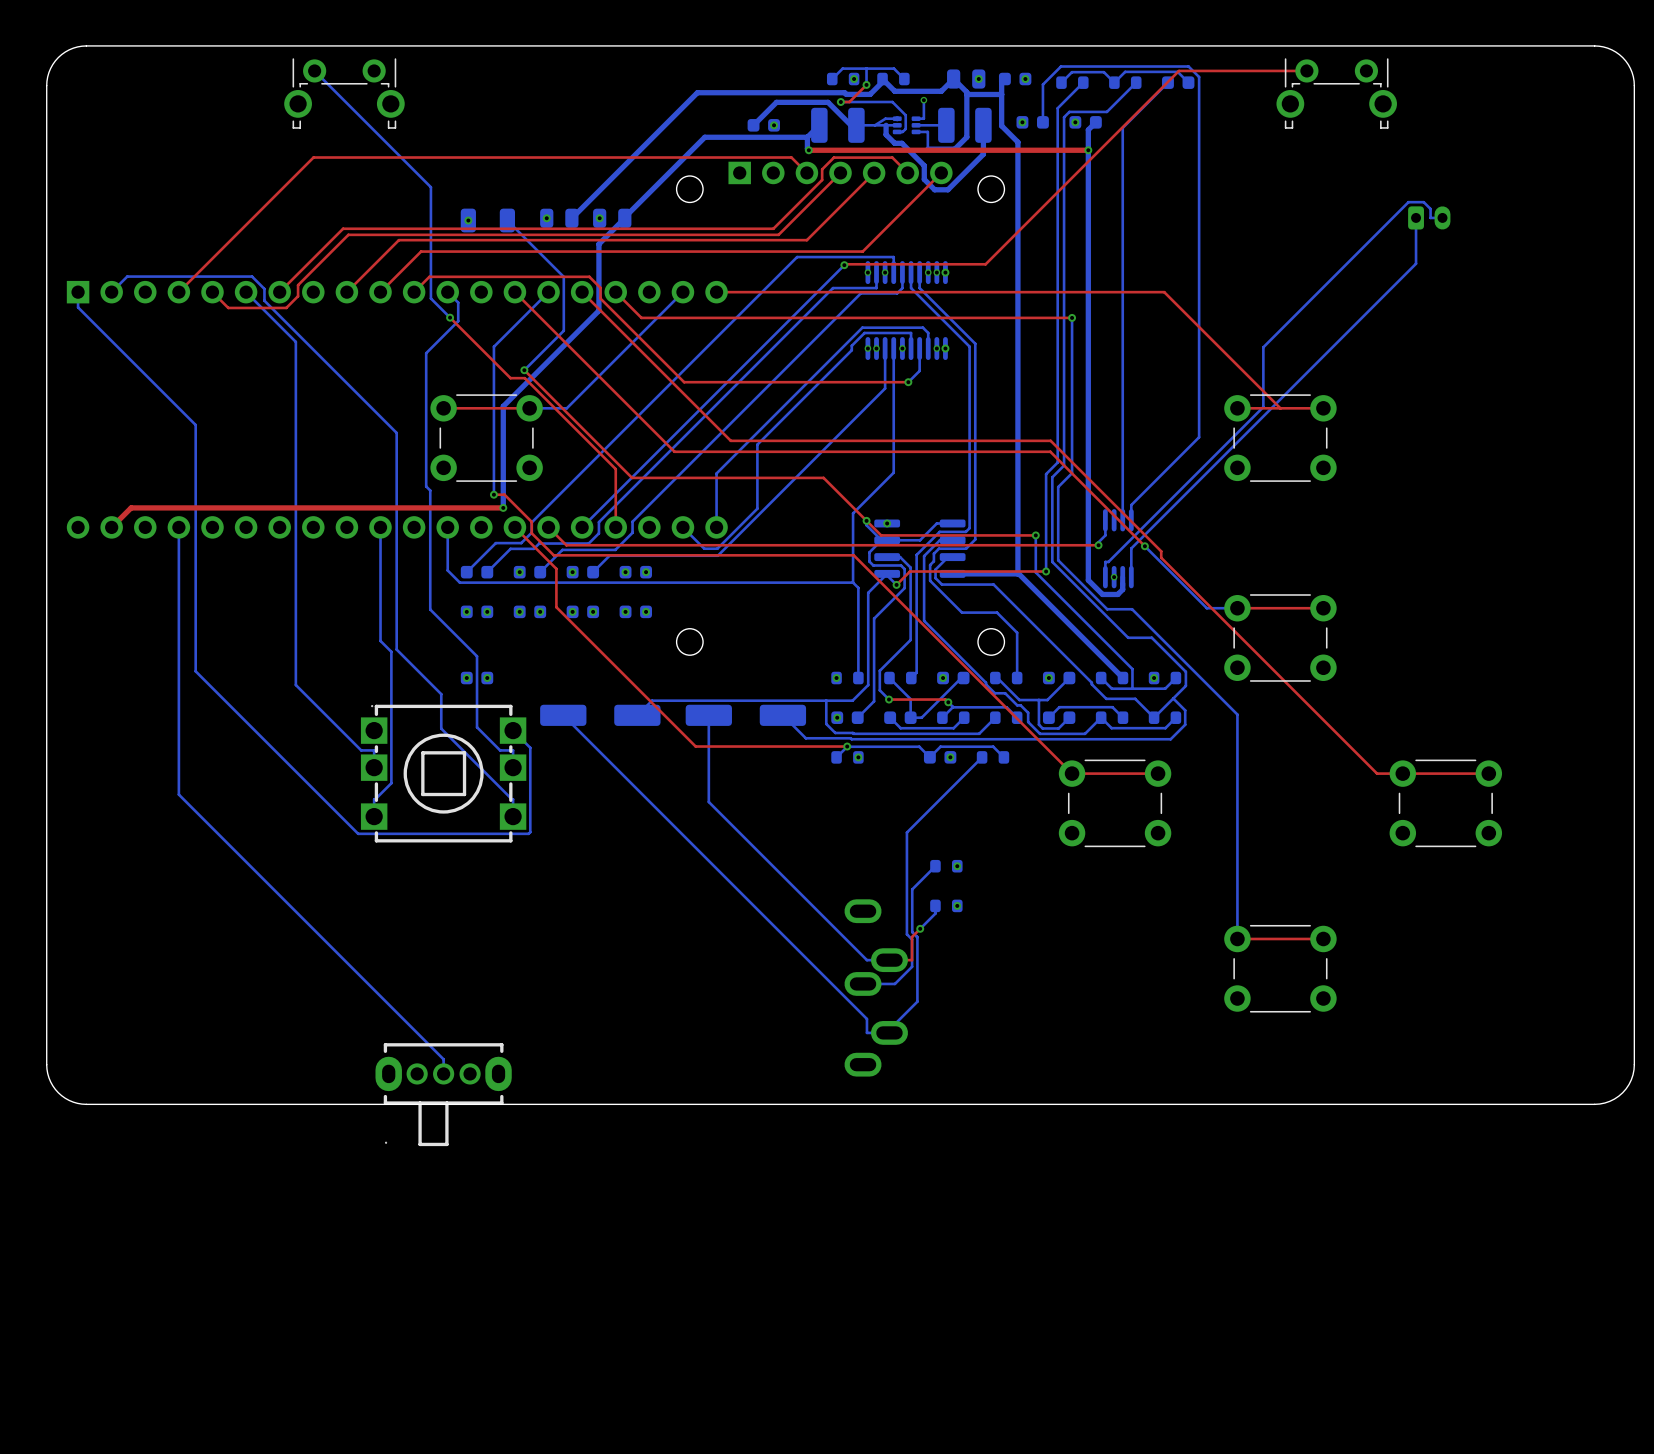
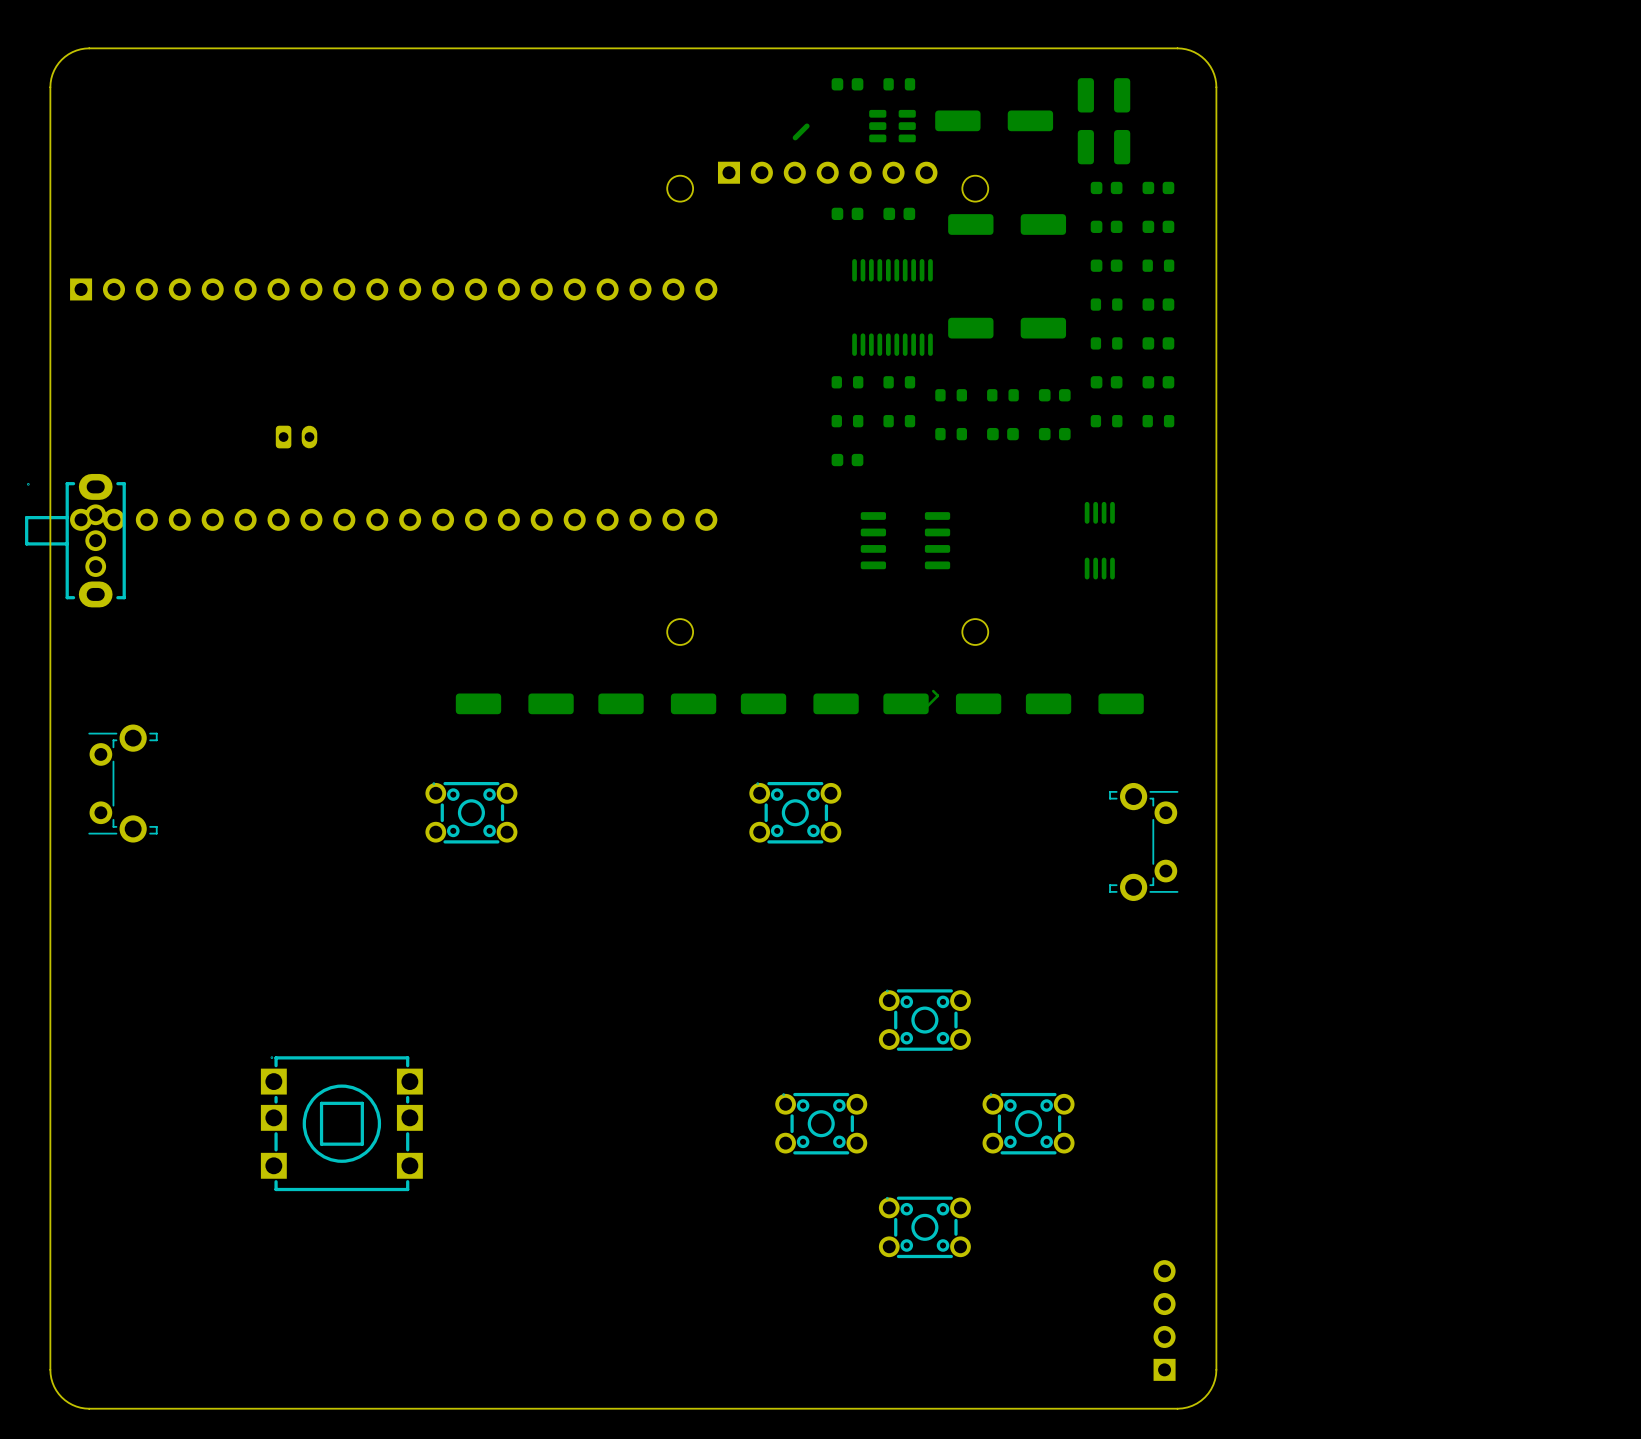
board edge: (1197, 45) (1599, 46) (1619, 54) (1632, 72) (1634, 85) (1634, 1064) (1631, 1079) (1622, 1092) (1609, 1101) (1594, 1104) (86, 1104) (73, 1102) (58, 1092) (50, 1081) (46, 1064) -> (1177, 48) (1190, 50) (1205, 59) (1212, 70) (1216, 87) (1216, 1369) (1213, 1384) (1205, 1397) (1192, 1405) (1177, 1408) (89, 1408) (76, 1406) (58, 1394) (50, 1374) (50, 1045)
bottom track: (866, 68) (866, 84) -> none
bottom track: (314, 70) (430, 187) (430, 298) (450, 317) -> none
top track: (1306, 70) (1178, 70) (985, 264) (844, 265) -> none
part footprint: [1109, 76, 1142, 89] -> [1077, 78, 1131, 113]
bottom track: (832, 79) (842, 68) (893, 68) (904, 79) -> none
part: (843, 79) -> none
via: (854, 79) -> none
part position: (893, 79) -> (899, 84)
part: (966, 79) -> none
via: (978, 79) -> none
bottom track: (1004, 79) (1001, 82) (1001, 125) (1017, 142) (1017, 573) -> none
part: (1015, 79) -> none
via: (1025, 79) -> none
part: none -> (847, 84)
bottom track: (1061, 82) (1071, 72) (1103, 72) (1114, 82) (1125, 71) (1177, 71) (1188, 82) -> none
part: (1072, 82) -> none
bottom track: (1083, 82) (1057, 108) (1057, 462) (1046, 474) (1046, 571) -> none
bottom track: (1136, 82) (1106, 111) (1069, 111) (1064, 117) (1064, 465) (1052, 477) (1052, 561) (1128, 637) (1151, 637) (1185, 671) (1185, 685) (1154, 717) (1135, 698) (1106, 698) (993, 584) (941, 584) (935, 578) (935, 569) (948, 557) (952, 557) -> none
bottom track: (1167, 82) (1122, 127) (1122, 520) -> none
part: (1178, 82) -> none
top track: (866, 84) (849, 102) (840, 102) -> none
via: (866, 84) -> none
part: (344, 93) -> none
part: (1336, 93) -> none
bottom track: (966, 94) (1001, 94) -> none
bottom track: (923, 100) (923, 118) (916, 118) -> none
via: (923, 100) -> none
bottom track: (840, 102) (892, 102) (905, 115) (905, 128) (902, 131) (897, 131) -> none
via: (840, 102) -> none
part footprint: [892, 116, 921, 135] -> [869, 109, 916, 143]
bottom track: (897, 118) (885, 118) (874, 125) -> none
part: none -> (994, 120)
via: (1022, 122) -> none
part: (1032, 122) -> none
bottom track: (1042, 122) (1042, 84) (1060, 66) (1188, 66) (1199, 77) (1199, 437) (1131, 505) (1131, 520) -> none
via: (1075, 122) -> none
part: (1085, 122) -> none
bottom track: (1095, 122) (1088, 129) (1088, 580) (1102, 594) (1117, 594) (1122, 589) (1122, 577) -> none
bottom track: (753, 125) (776, 102) (828, 102) (851, 125) (897, 125) -> none
part: (763, 125) -> none
via: (774, 125) -> none
part: (837, 125) -> none
bottom track: (886, 125) (886, 134) (894, 143) (901, 143) (924, 165) (924, 179) (934, 189) (947, 189) (983, 154) (983, 125) -> none
bottom track: (916, 125) (946, 125) -> none
part: (964, 125) -> none
bottom track: (916, 131) (927, 131) (927, 149) (954, 149) (966, 137) (966, 92) (953, 79) (941, 91) (894, 91) (882, 79) (882, 82) (870, 94) (697, 92) (571, 218) -> none
part: none -> (1104, 147)
bottom track: (808, 150) (807, 137) (704, 137) (598, 244) (598, 310) (503, 406) (503, 507) -> none
top track: (808, 150) (1088, 150) -> none
via: (808, 150) -> none
via: (1088, 150) -> none
top track: (806, 172) (791, 157) (313, 157) (178, 292) -> none
top track: (840, 172) (778, 234) (348, 234) (298, 285) (298, 296) (286, 307) (228, 307) (212, 292) -> none
top track: (874, 172) (806, 240) (398, 240) (346, 292) -> none
top track: (907, 172) (892, 157) (833, 157) (822, 169) (822, 180) (773, 228) (343, 228) (279, 292) -> none
top track: (941, 172) (862, 251) (421, 251) (380, 292) -> none
part: none -> (1106, 187)
part: none -> (1158, 187)
part: none -> (847, 213)
part: none -> (899, 213)
bottom track: (1416, 217) (1416, 263) (1131, 548) (1131, 577) -> none
part: (1429, 217) -> none
bottom track: (1442, 217) (1430, 217) (1430, 208) (1423, 202) (1408, 202) (1263, 347) (1263, 407) (1108, 561) (1105, 561) (1105, 577) -> none
via: (546, 218) -> none
part: (559, 218) -> none
via: (599, 218) -> none
part: (612, 218) -> none
via: (468, 220) -> none
part: (487, 220) -> none
bottom track: (507, 220) (563, 276) (563, 330) (524, 370) -> none
part: none -> (1007, 224)
part: none -> (1106, 226)
part: none -> (1158, 226)
bottom track: (844, 265) (582, 527) -> none
via: (844, 265) -> none
part: none -> (1106, 265)
part: none -> (1158, 265)
via: (867, 272) -> none
bottom track: (876, 272) (876, 288) (833, 288) (598, 522) (598, 533) (588, 543) (539, 543) (533, 548) (510, 548) (487, 572) -> none
via: (885, 272) -> none
bottom track: (893, 272) (893, 257) (797, 257) (531, 522) (531, 532) (521, 543) (495, 543) (466, 572) -> none
bottom track: (902, 272) (902, 288) (897, 293) (860, 293) (632, 521) (632, 532) (615, 549) (562, 549) (540, 572) -> none
bottom track: (911, 272) (911, 288) (969, 346) (969, 528) (965, 531) (939, 531) (916, 554) (916, 672) (911, 678) -> none
bottom track: (919, 272) (919, 288) (975, 343) (975, 539) (966, 548) (939, 548) (933, 553) (933, 561) (930, 565) (930, 580) (961, 612) (996, 612) (1017, 632) (1017, 678) -> none
via: (928, 272) -> none
via: (936, 272) -> none
via: (945, 272) -> none
bottom track: (78, 292) (78, 307) (195, 425) (195, 671) (358, 833) (528, 833) (530, 832) (530, 747) (513, 730) -> none
bottom track: (111, 292) (127, 276) (252, 276) (264, 288) (264, 300) (396, 432) (396, 649) (441, 694) (441, 728) (513, 799) (513, 816) -> none
bottom track: (246, 292) (295, 341) (295, 685) (361, 750) (374, 750) (374, 767) -> none
top track: (414, 292) (429, 276) (589, 276) (600, 287) (600, 298) (684, 382) (908, 382) -> none
bottom track: (447, 292) (458, 302) (458, 321) (426, 353) (426, 486) (430, 490) (430, 609) (477, 656) (477, 727) (500, 750) (513, 750) (513, 767) -> none
top track: (514, 292) (674, 451) (1050, 451) (1144, 546) -> none
bottom track: (548, 292) (493, 346) (493, 494) -> none
top track: (582, 292) (730, 440) (1050, 440) (1161, 551) (1161, 557) (1377, 773) (1488, 773) -> none
top track: (615, 292) (641, 317) (1072, 317) -> none
bottom track: (682, 292) (566, 408) (529, 408) -> none
top track: (716, 292) (1164, 292) (1280, 408) -> none
part: none -> (1106, 304)
part: none -> (1158, 304)
top track: (450, 317) (510, 378) (524, 378) (615, 469) (615, 527) -> none
via: (450, 317) -> none
bottom track: (1072, 317) (1072, 473) (1058, 487) (1058, 560) (1107, 609) (1132, 609) (1237, 714) (1237, 938) -> none
via: (1072, 317) -> none
part: none -> (1007, 328)
part: none -> (1106, 343)
part: none -> (1158, 343)
via: (867, 348) -> none
via: (876, 348) -> none
bottom track: (885, 348) (885, 388) (717, 555) (609, 555) (593, 572) -> none
bottom track: (893, 348) (893, 472) (853, 513) (853, 582) -> none
via: (902, 348) -> none
bottom track: (911, 348) (911, 333) (864, 333) (851, 345) (851, 350) (757, 444) (757, 508) (717, 548) (704, 548) (682, 527) -> none
bottom track: (919, 348) (919, 370) (908, 382) -> none
bottom track: (928, 348) (928, 333) (922, 327) (862, 327) (716, 473) (716, 527) -> none
via: (936, 348) -> none
via: (945, 348) -> none
top track: (524, 370) (632, 477) (823, 477) (881, 535) (1035, 535) -> none
via: (524, 370) -> none
via: (908, 382) -> none
part: none -> (847, 382)
part: none -> (899, 382)
part: none -> (1106, 382)
part: none -> (1158, 382)
part: none -> (951, 395)
part: none -> (1002, 395)
part: none -> (1054, 395)
top track: (443, 408) (529, 408) -> none
top track: (1237, 408) (1323, 408) -> none
part: none -> (847, 421)
part: none -> (899, 421)
part: none -> (1106, 421)
part: none -> (1158, 421)
part: (486, 438) -> none
part: (1280, 438) -> none
part: none -> (951, 434)
part: none -> (1002, 434)
part: none -> (1054, 434)
part: none -> (296, 437)
part: none -> (847, 460)
top track: (493, 494) (504, 494) (531, 521) (531, 533) (553, 555) (853, 555) (1072, 773) (1158, 773) -> none
via: (493, 494) -> none
top track: (503, 507) (131, 507) (111, 527) -> none
via: (503, 507) -> none
bottom track: (866, 520) (866, 525) (881, 540) -> none
via: (866, 520) -> none
bottom track: (1105, 520) (1105, 535) (1098, 542) (1098, 545) -> none
via: (887, 523) -> none
bottom track: (952, 523) (936, 523) (920, 540) (881, 540) -> none
bottom track: (178, 527) (178, 794) (443, 1059) (443, 1073) -> none
bottom track: (380, 527) (380, 640) (391, 651) (391, 783) (374, 799) (374, 816) -> none
bottom track: (447, 527) (447, 570) (459, 582) (853, 582) -> none
top track: (514, 527) (556, 568) (556, 607) (695, 746) (847, 746) -> none
top track: (548, 527) (566, 545) (1098, 545) -> none
bottom track: (1035, 535) (1035, 572) (1132, 669) (1132, 688) -> none
via: (1035, 535) -> none
bottom track: (881, 540) (869, 552) (869, 561) (873, 565) (901, 565) (904, 569) (904, 588) (874, 618) (874, 701) (857, 717) -> none
bottom track: (952, 540) (939, 540) (924, 556) (924, 620) (994, 693) (1005, 693) (1017, 705) (1020, 705) (1028, 712) (1028, 722) (1040, 733) (1085, 733) (1101, 717) (1111, 728) (1165, 728) (1175, 717) -> none
via: (1098, 545) -> none
bottom track: (1144, 546) (1206, 608) (1237, 608) -> none
via: (1144, 546) -> none
part: none -> (75, 540)
bottom track: (887, 557) (900, 557) (910, 567) (910, 639) (879, 670) (879, 690) (889, 699) -> none
top track: (1046, 571) (909, 571) (896, 584) -> none
via: (1046, 571) -> none
part: (477, 572) -> none
via: (519, 572) -> none
part: (529, 572) -> none
via: (572, 572) -> none
part: (582, 572) -> none
via: (625, 572) -> none
part: (635, 572) -> none
via: (646, 572) -> none
bottom track: (952, 573) (1018, 573) (1122, 678) -> none
via: (1114, 577) -> none
bottom track: (853, 582) (858, 587) (858, 678) -> none
bottom track: (896, 584) (887, 573) (868, 592) (868, 685) (852, 700) (652, 700) (637, 715) -> none
via: (896, 584) -> none
top track: (1237, 608) (1323, 608) -> none
via: (466, 611) -> none
part: (477, 611) -> none
via: (487, 611) -> none
via: (519, 611) -> none
part: (529, 611) -> none
via: (540, 611) -> none
via: (572, 611) -> none
part: (582, 611) -> none
via: (593, 611) -> none
via: (625, 611) -> none
part: (635, 611) -> none
via: (646, 611) -> none
part: (1280, 637) -> none
via: (466, 678) -> none
part: (477, 678) -> none
via: (487, 678) -> none
via: (836, 678) -> none
part: (847, 678) -> none
bottom track: (889, 678) (910, 699) (910, 717) (921, 717) (961, 678) (963, 678) -> none
part: (900, 678) -> none
via: (943, 678) -> none
part: (953, 678) -> none
bottom track: (995, 678) (1019, 700) (1047, 700) (1069, 678) -> none
part: (1006, 678) -> none
via: (1048, 678) -> none
part: (1059, 678) -> none
bottom track: (1101, 678) (1111, 688) (1165, 688) (1175, 678) -> none
part: (1112, 678) -> none
via: (1154, 678) -> none
part: (1165, 678) -> none
bottom track: (1173, 698) (1185, 710) (1185, 724) (1170, 739) (805, 738) (782, 715) -> none
top track: (889, 699) (945, 699) (948, 702) -> none
via: (889, 699) -> none
bottom track: (826, 700) (826, 723) (835, 732) (979, 733) (995, 717) -> none
bottom track: (1038, 700) (1038, 724) (1042, 728) (1058, 728) (1069, 717) -> none
via: (948, 702) -> none
bottom track: (952, 707) (1006, 707) (1017, 717) -> none
part footprint: [937, 711, 970, 724] -> [883, 693, 1002, 715]
part footprint: [1095, 711, 1129, 724] -> [1025, 693, 1144, 715]
part: none -> (514, 703)
bottom track: (563, 715) (866, 1019) (866, 1032) (889, 1032) -> none
part: (600, 715) -> none
part: none -> (657, 703)
bottom track: (708, 715) (708, 802) (866, 960) (889, 960) -> none
part: (745, 715) -> none
part: none -> (799, 703)
via: (837, 717) -> none
part: (847, 717) -> none
bottom track: (890, 717) (900, 728) (953, 728) (964, 717) -> none
part: (900, 717) -> none
part: (1006, 717) -> none
bottom track: (1048, 717) (1059, 707) (1112, 707) (1122, 717) -> none
part: (1059, 717) -> none
part: (1165, 717) -> none
via: (847, 746) -> none
bottom track: (836, 757) (847, 746) (919, 746) (929, 757) (940, 746) (993, 746) (1003, 757) -> none
part: (847, 757) -> none
via: (858, 757) -> none
part: (940, 757) -> none
via: (950, 757) -> none
bottom track: (982, 757) (906, 832) (906, 934) (912, 939) (912, 966) (894, 983) (863, 983) -> none
part: (993, 757) -> none
part: (443, 773) -> none
part: none -> (122, 783)
part: (1115, 803) -> none
part: (1445, 803) -> none
part: none -> (471, 812)
part: none -> (795, 812)
part: none -> (1143, 841)
bottom track: (935, 866) (912, 889) (912, 932) (917, 937) (917, 1001) (886, 1032) -> none
part: (946, 866) -> none
via: (957, 866) -> none
bottom track: (935, 905) (935, 913) (920, 928) -> none
part: (946, 905) -> none
via: (957, 905) -> none
top track: (920, 928) (911, 937) (911, 960) (889, 960) -> none
via: (920, 928) -> none
top track: (1237, 938) (1323, 938) -> none
part: (1280, 968) -> none
part: (876, 987) -> none
part: none -> (924, 1020)
part: (443, 1094) -> none
part: none -> (341, 1123)
part: none -> (821, 1123)
part: none -> (1028, 1123)
part: none -> (924, 1227)
part: none -> (1164, 1320)

